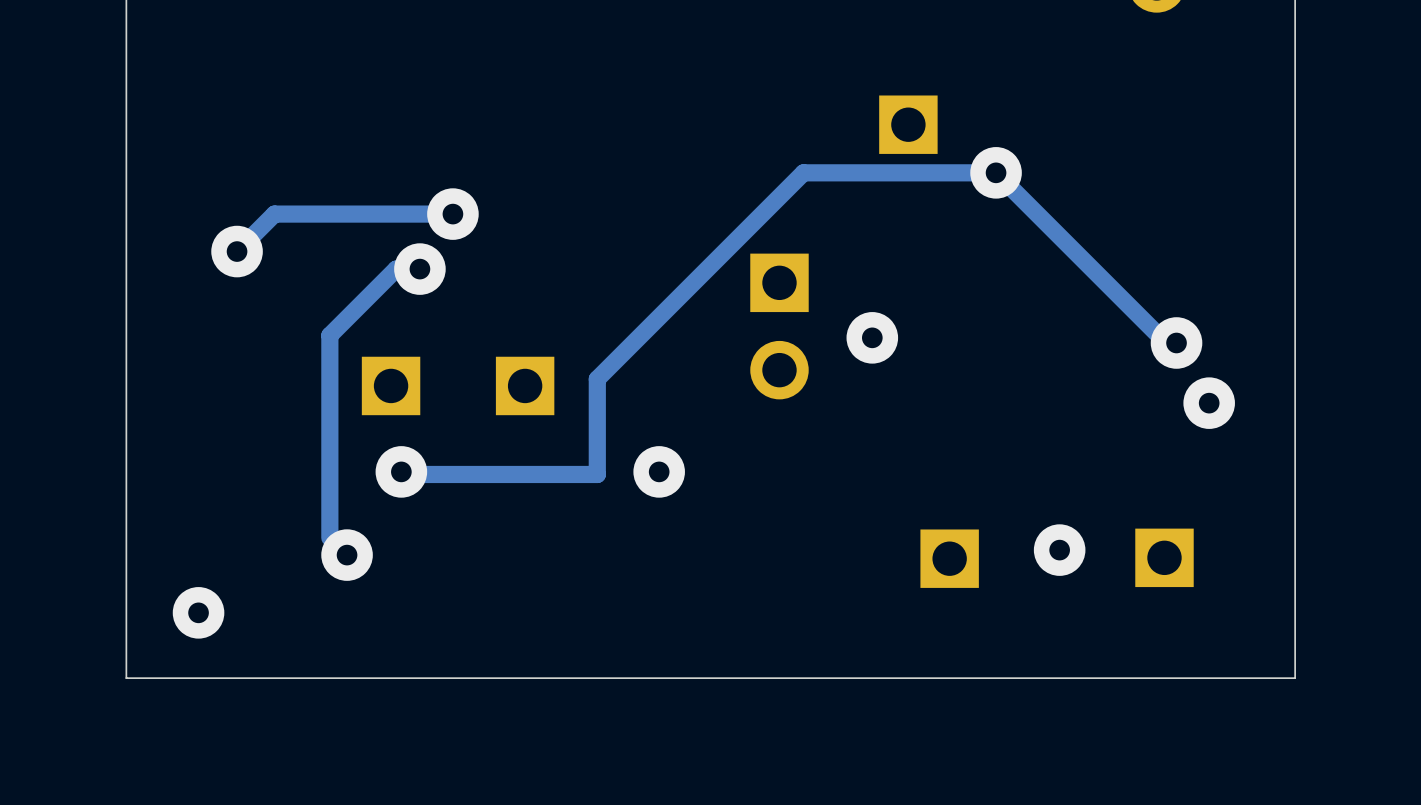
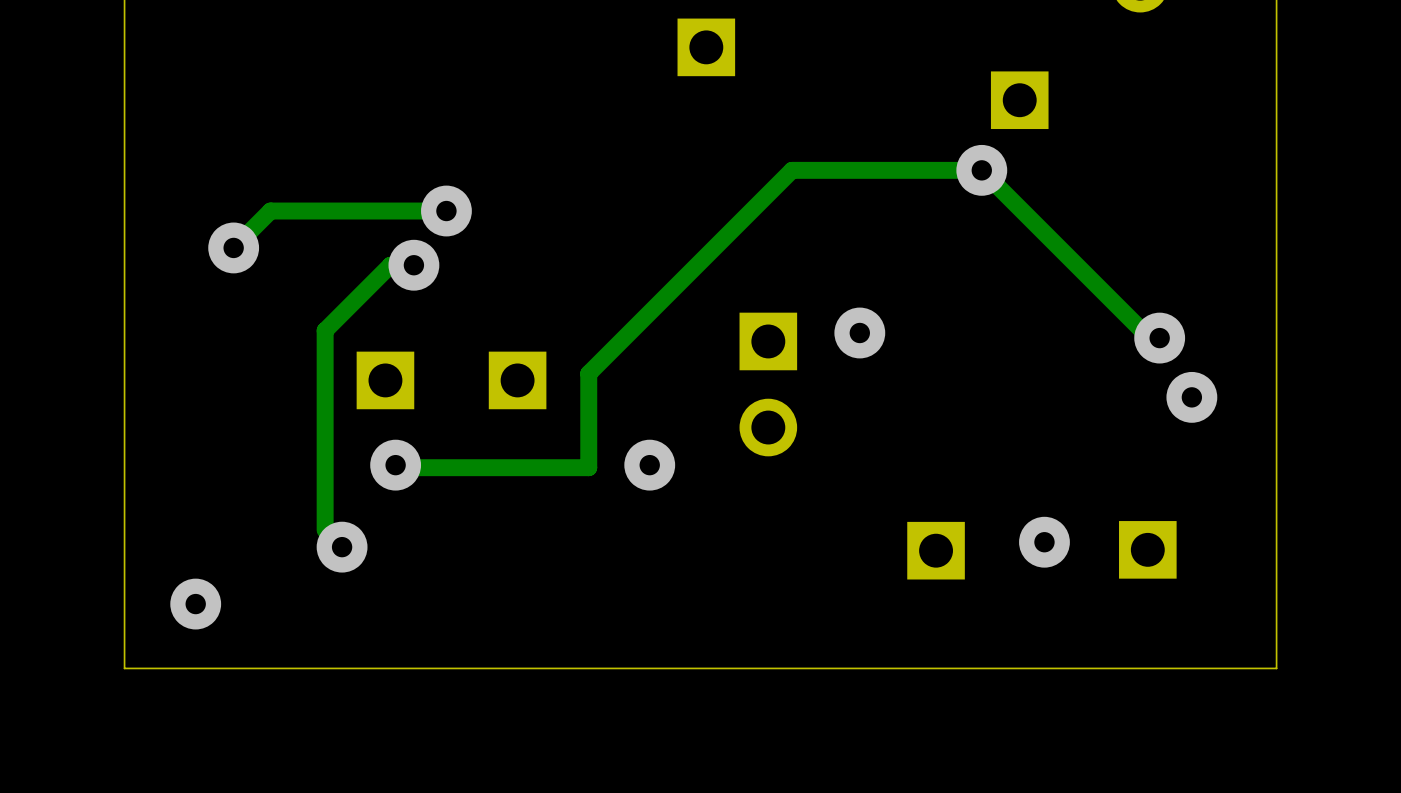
part: none -> (706, 47)
part: none -> (1019, 100)
part: (908, 124) -> none
part position: (779, 326) -> (768, 384)

